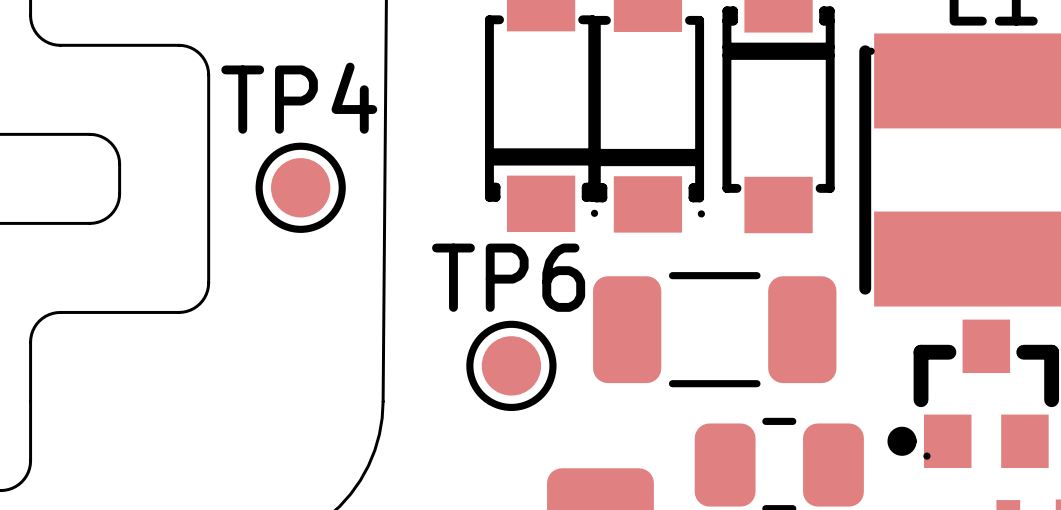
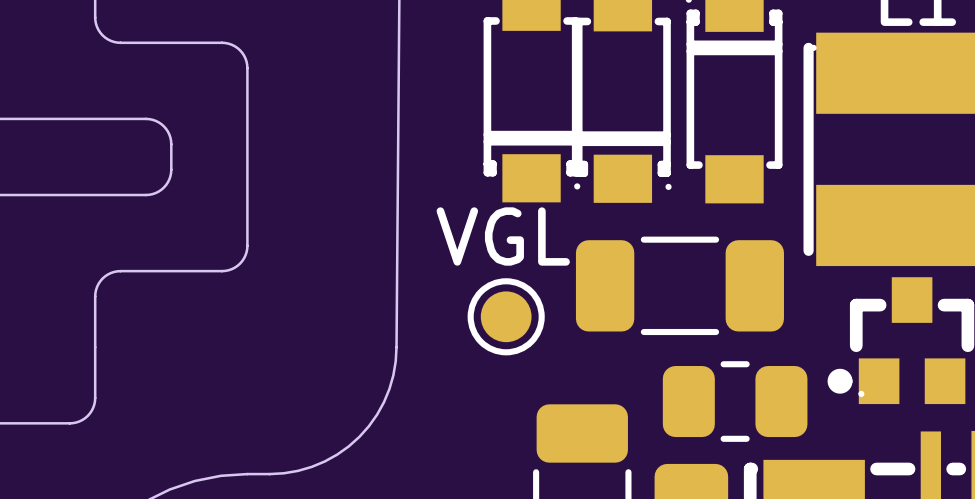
TP4: (300, 187) -> none
TP6 text: none -> VGL (503, 236)
TP6 name: TP6 (508, 277) -> none

